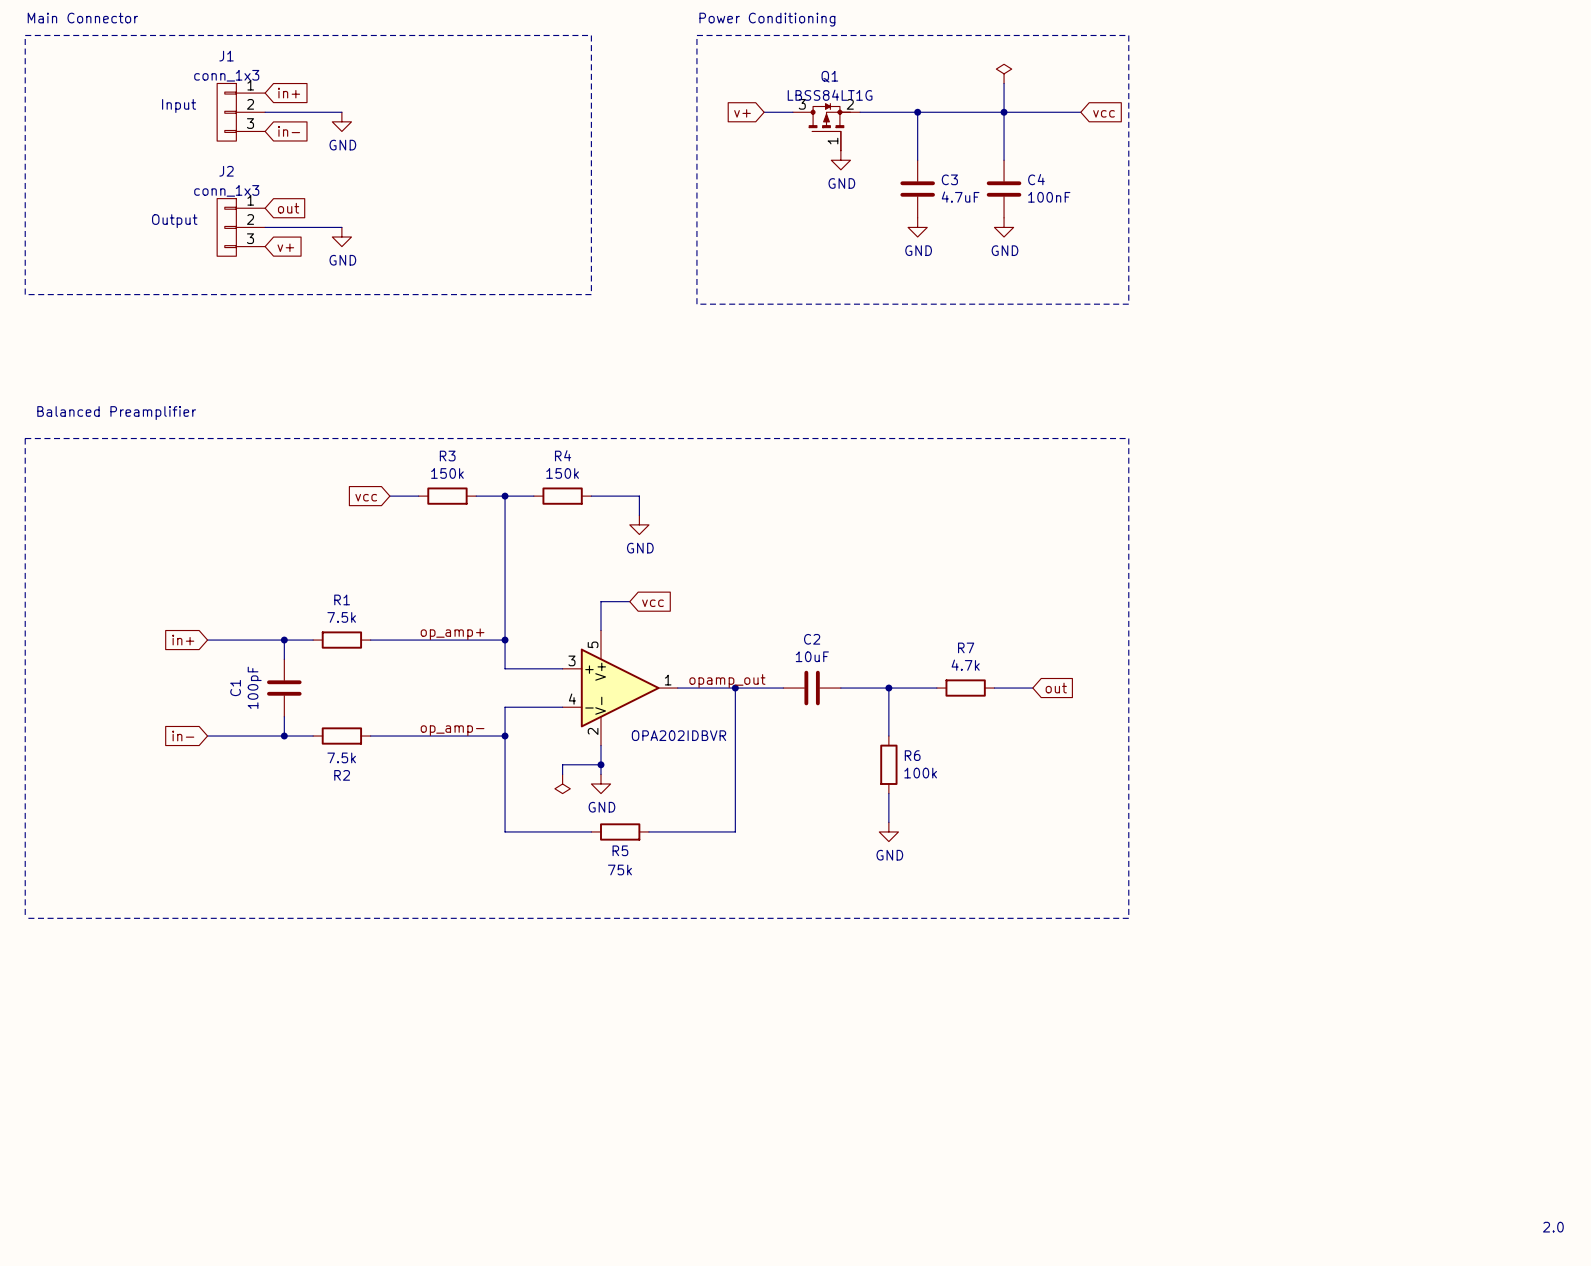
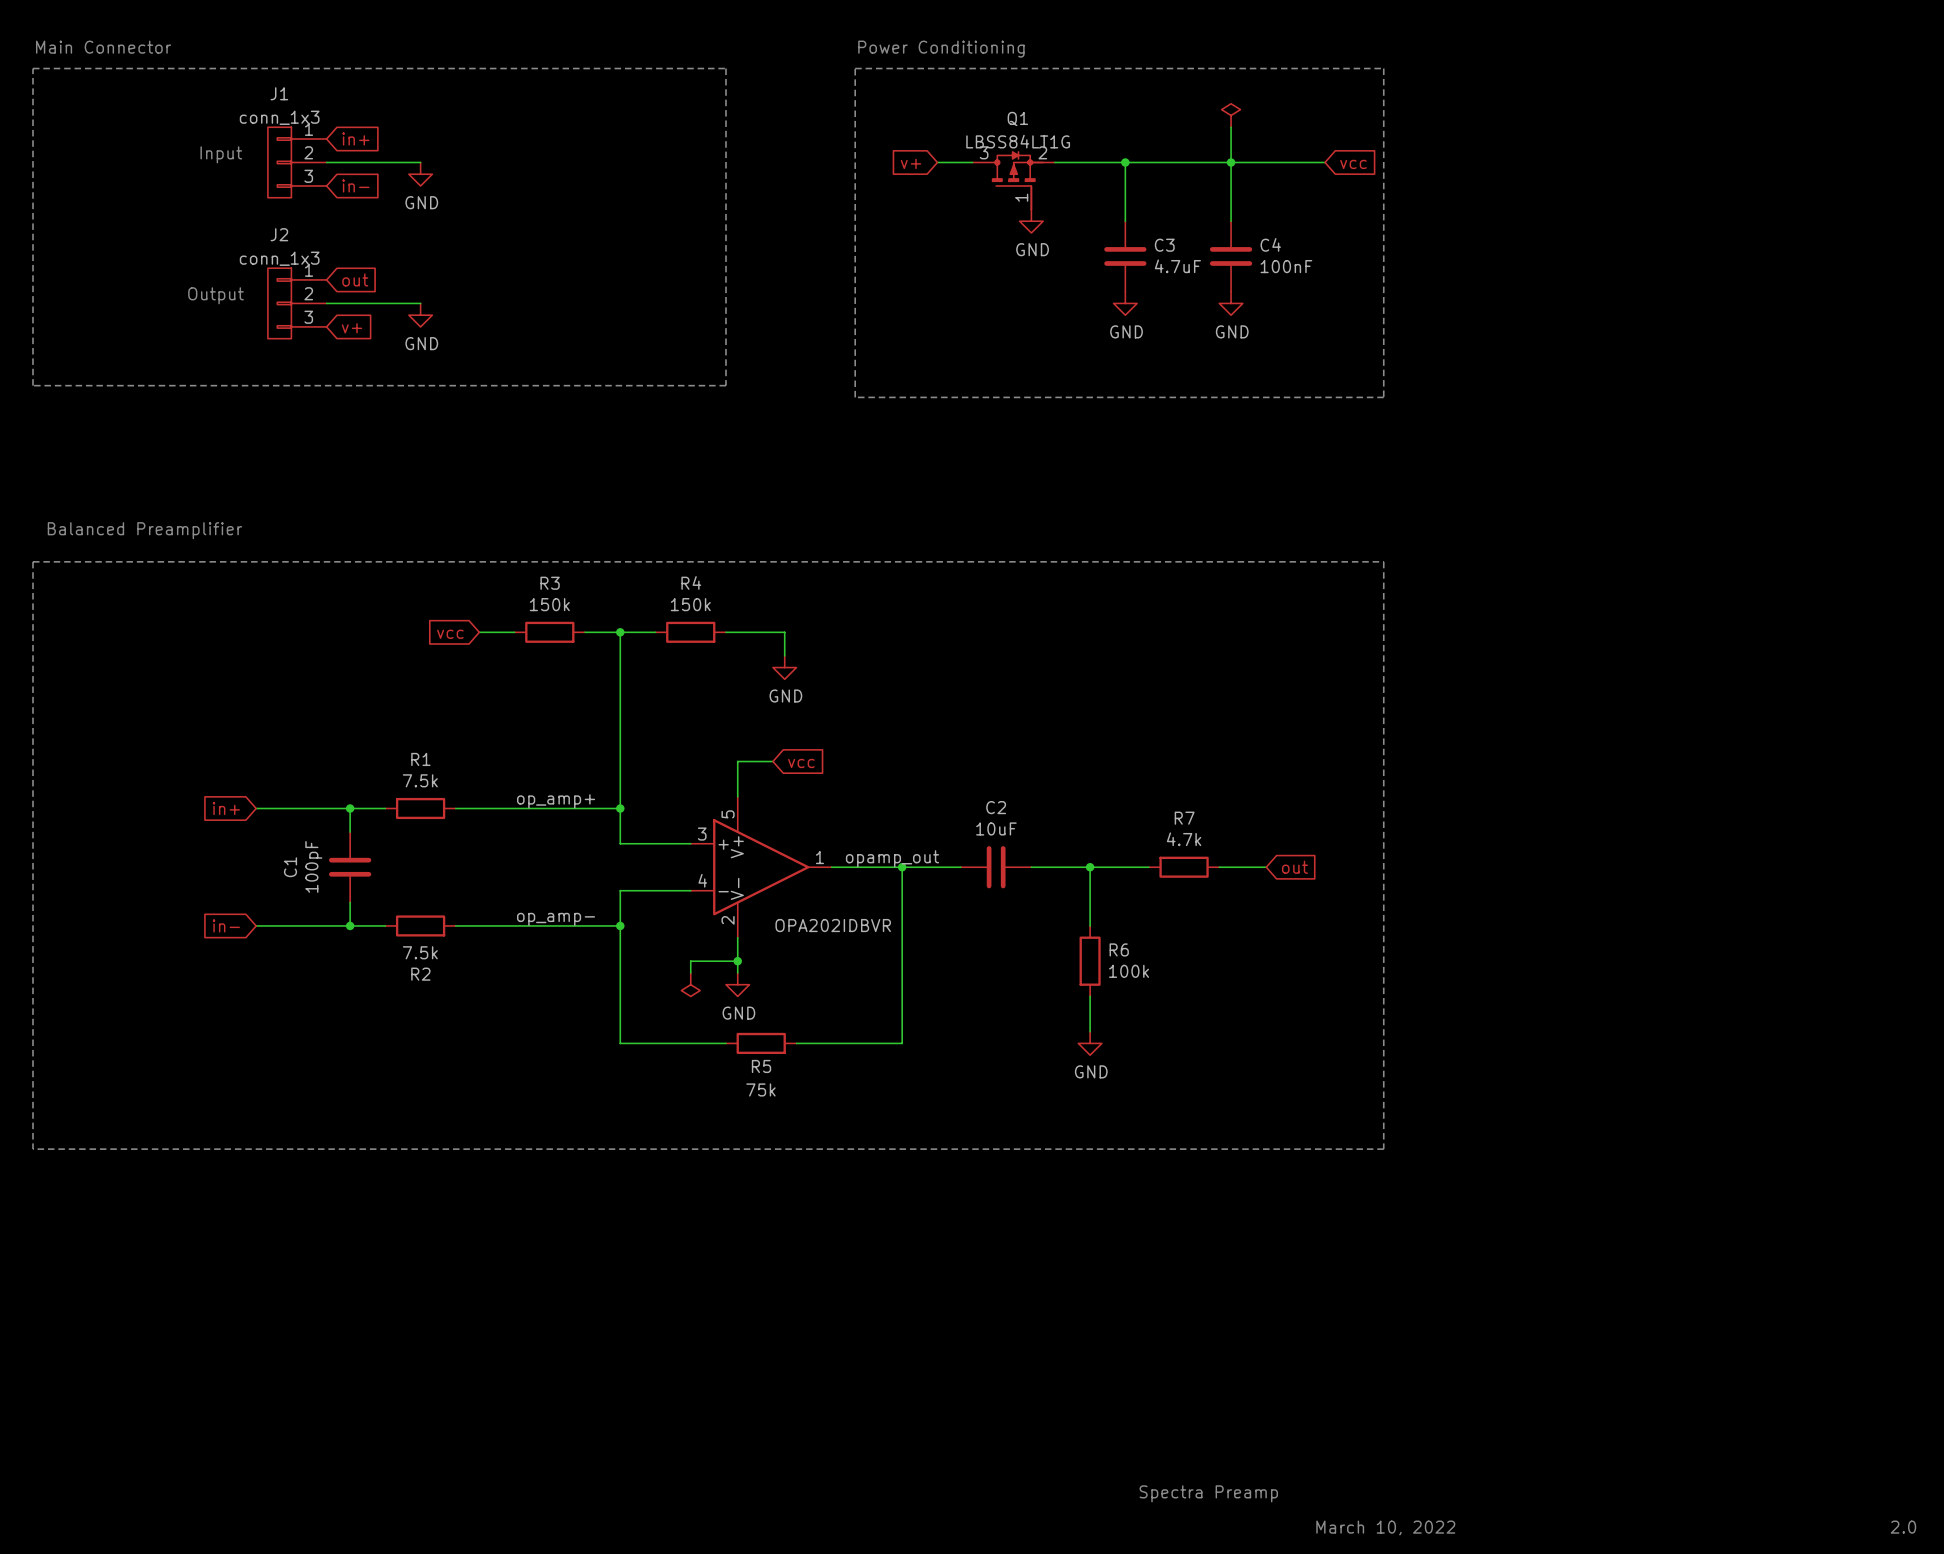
text: none -> Spectra Preamp (1208, 1493)
text: none -> March 10, 2022 (1385, 1527)

